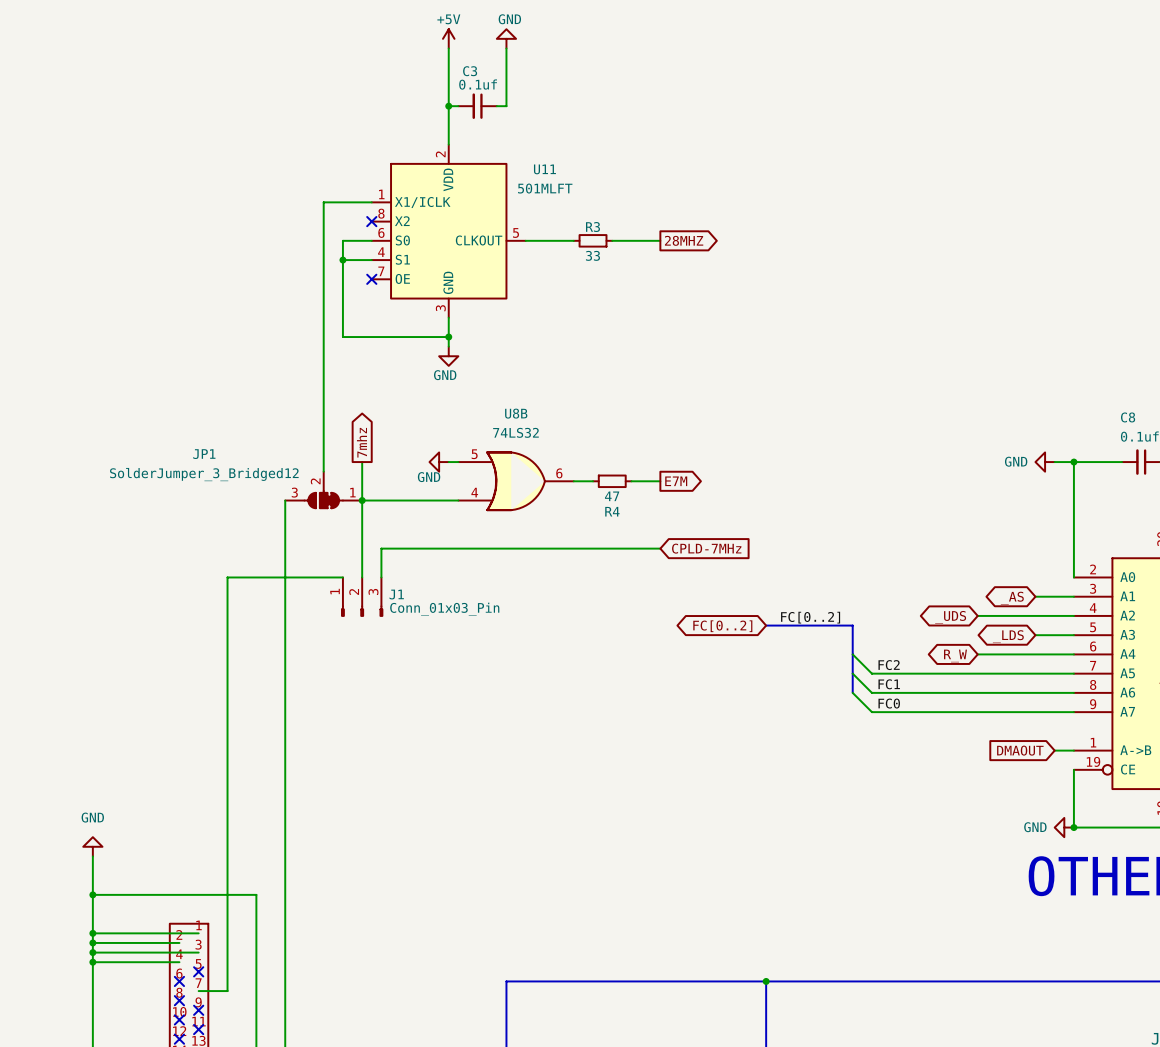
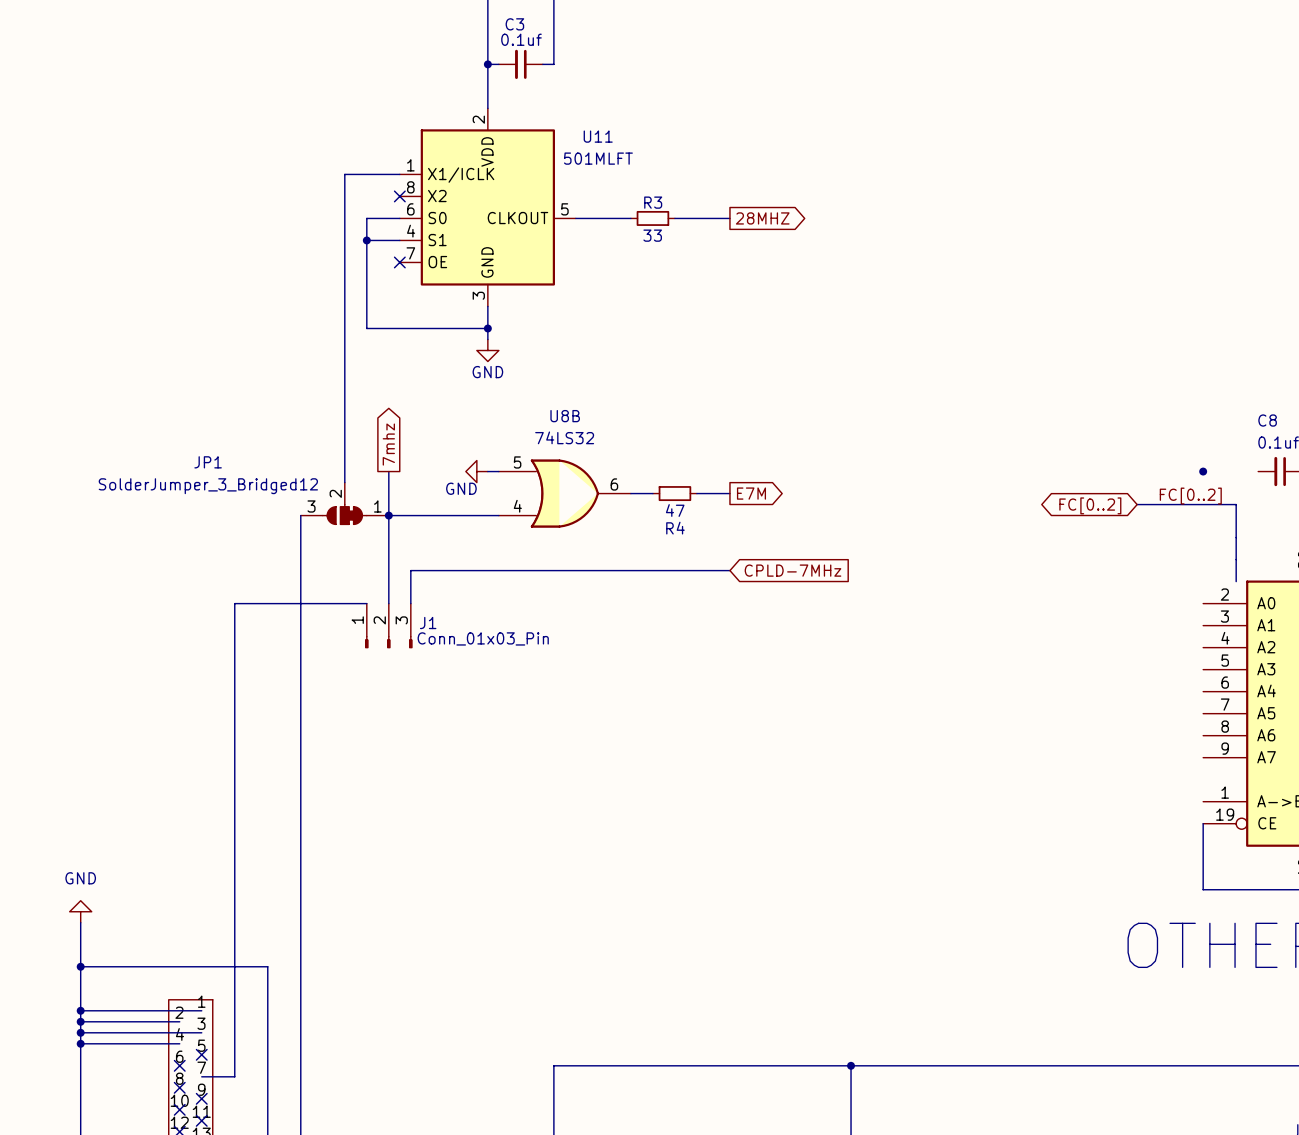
power symbol: GND (1045, 462) -> none
wire: (1054, 462) (1122, 462) -> none
wire: (1073, 462) (1073, 577) -> none
label: none -> FC[0..2] (1190, 496)
bus: none -> (1137, 504) (1236, 504) (1236, 581)
global label: none -> FC[0..2] (1090, 505)
wire: (1035, 596) (1073, 596) -> none
global label: _AS (1012, 598) -> none
wire: (977, 615) (1073, 615) -> none
label: FC[0..2] (810, 617) -> none
global label: _UDS (950, 617) -> none
bus: (766, 625) (852, 625) (852, 692) -> none
global label: FC[0..2] (722, 626) -> none
wire: (1035, 635) (1073, 635) -> none
global label: _LDS (1008, 636) -> none
wire: (852, 654) (871, 673) (1073, 673) -> none
wire: (977, 654) (1073, 654) -> none
global label: R_W (955, 655) -> none
label: FC2 (889, 665) -> none
wire: (852, 673) (871, 692) (1073, 692) -> none
label: FC1 (889, 684) -> none
wire: (852, 692) (871, 712) (1073, 712) -> none
label: FC0 (889, 703) -> none
global label: DMAOUT (1020, 750) -> none
wire: (1054, 750) (1073, 750) -> none
power symbol: GND (1064, 827) -> none
junction: (1073, 827) -> none

